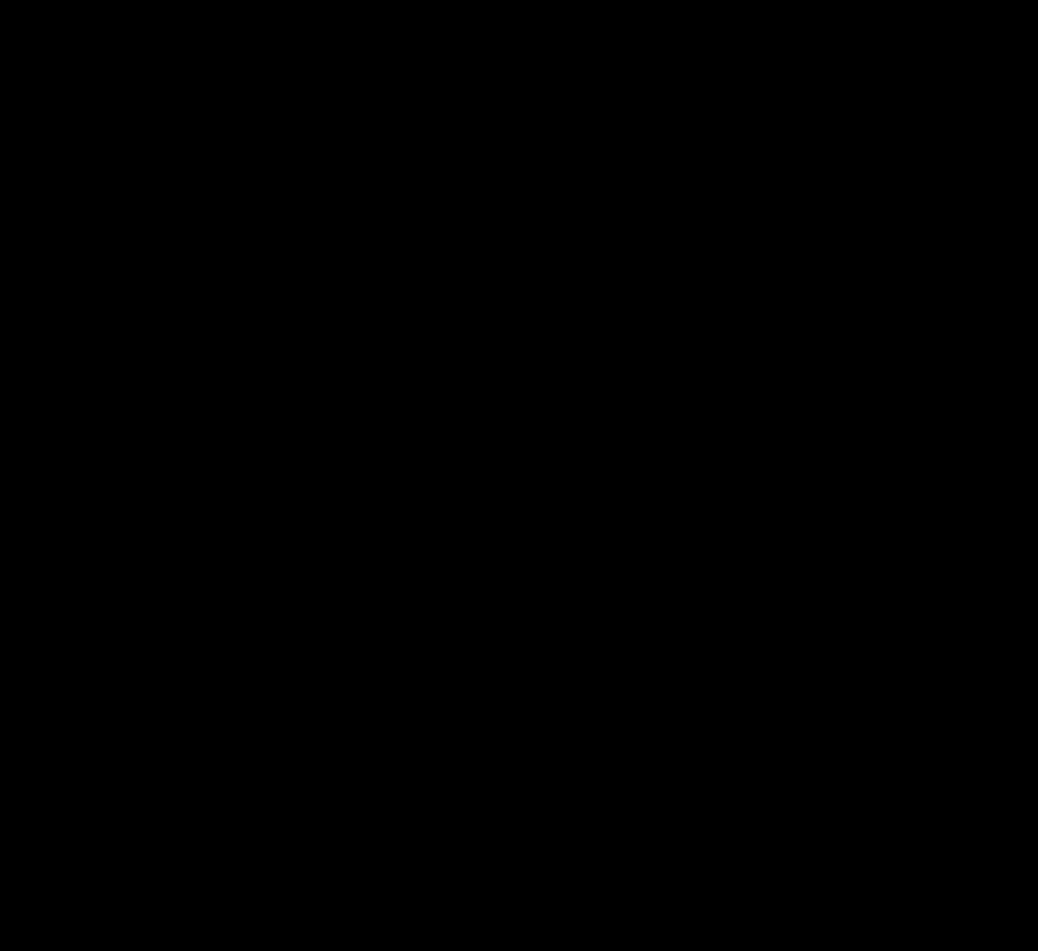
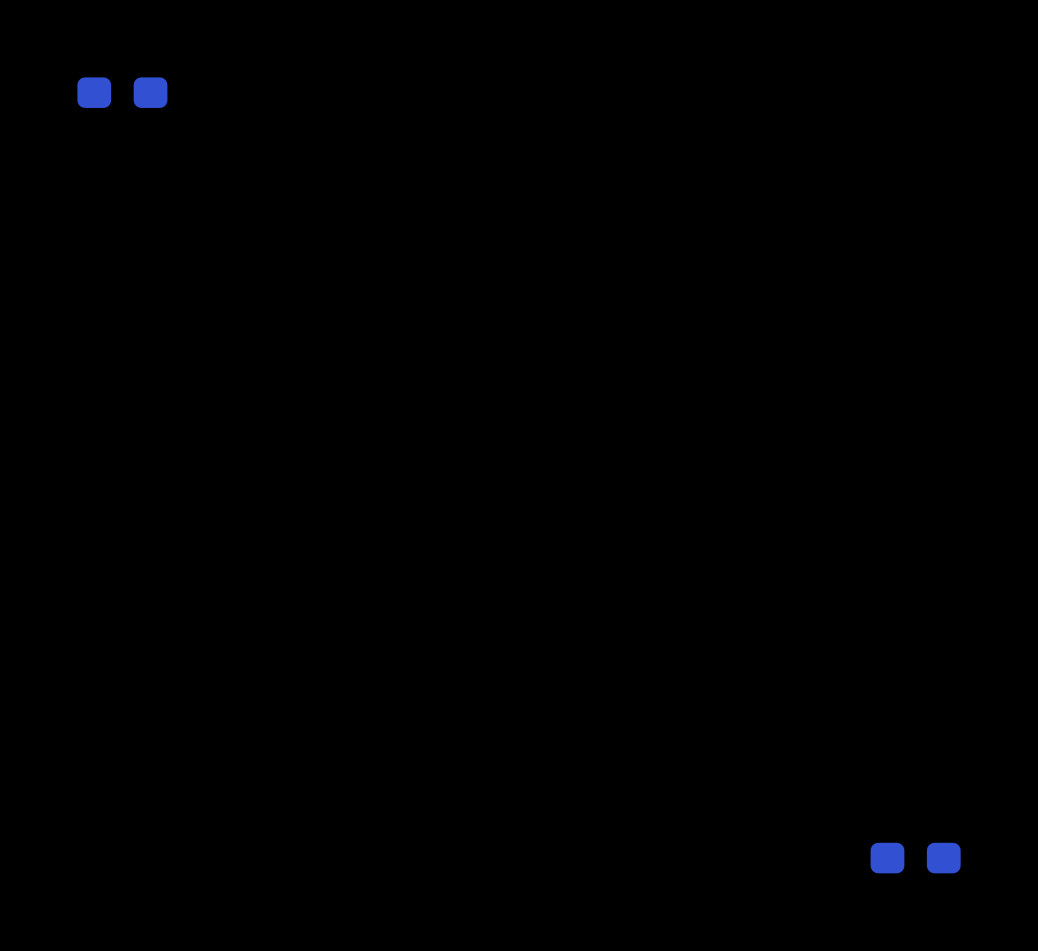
part: none -> (122, 92)
part: none -> (915, 858)

